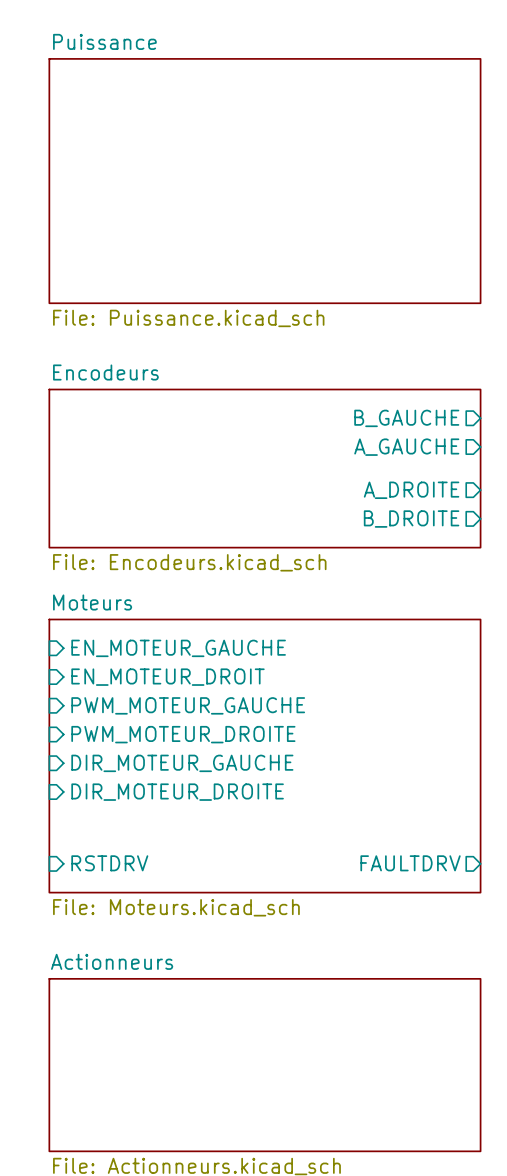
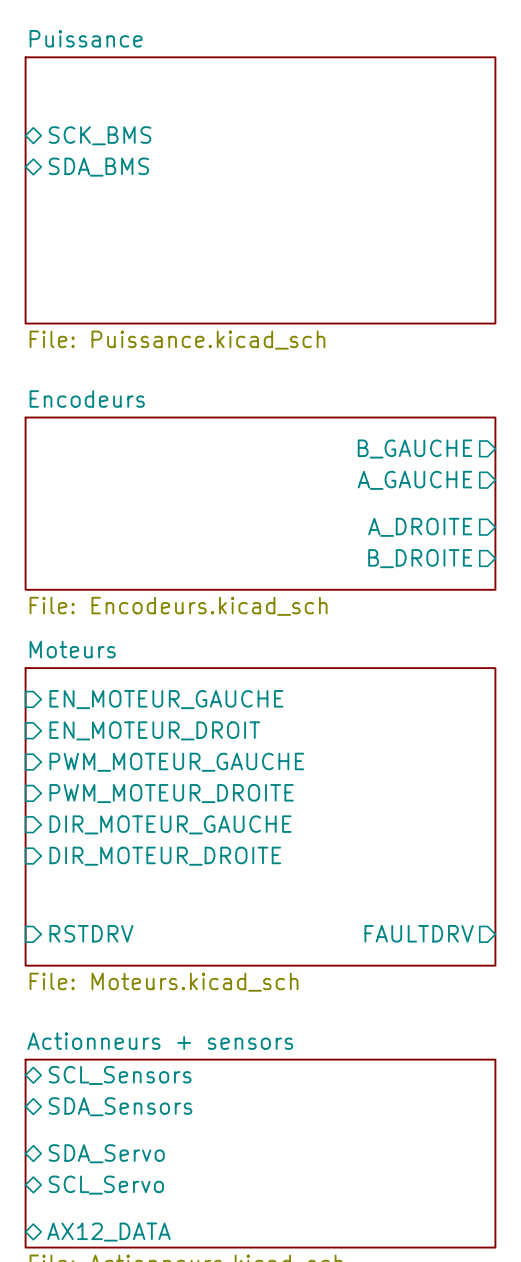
sheet pin: none -> SCK_BMS (100, 135)
sheet pin: none -> SDA_BMS (98, 167)
sheet Actionneurs name: Actionneurs (112, 961) -> Actionneurs + sensors (160, 1041)
sheet pin: none -> SCL_Sensors (120, 1075)
sheet pin: none -> SDA_Sensors (120, 1106)
sheet pin: none -> SDA_Servo (106, 1153)
sheet pin: none -> SCL_Servo (106, 1185)
sheet pin: none -> AX12_DATA (108, 1232)

